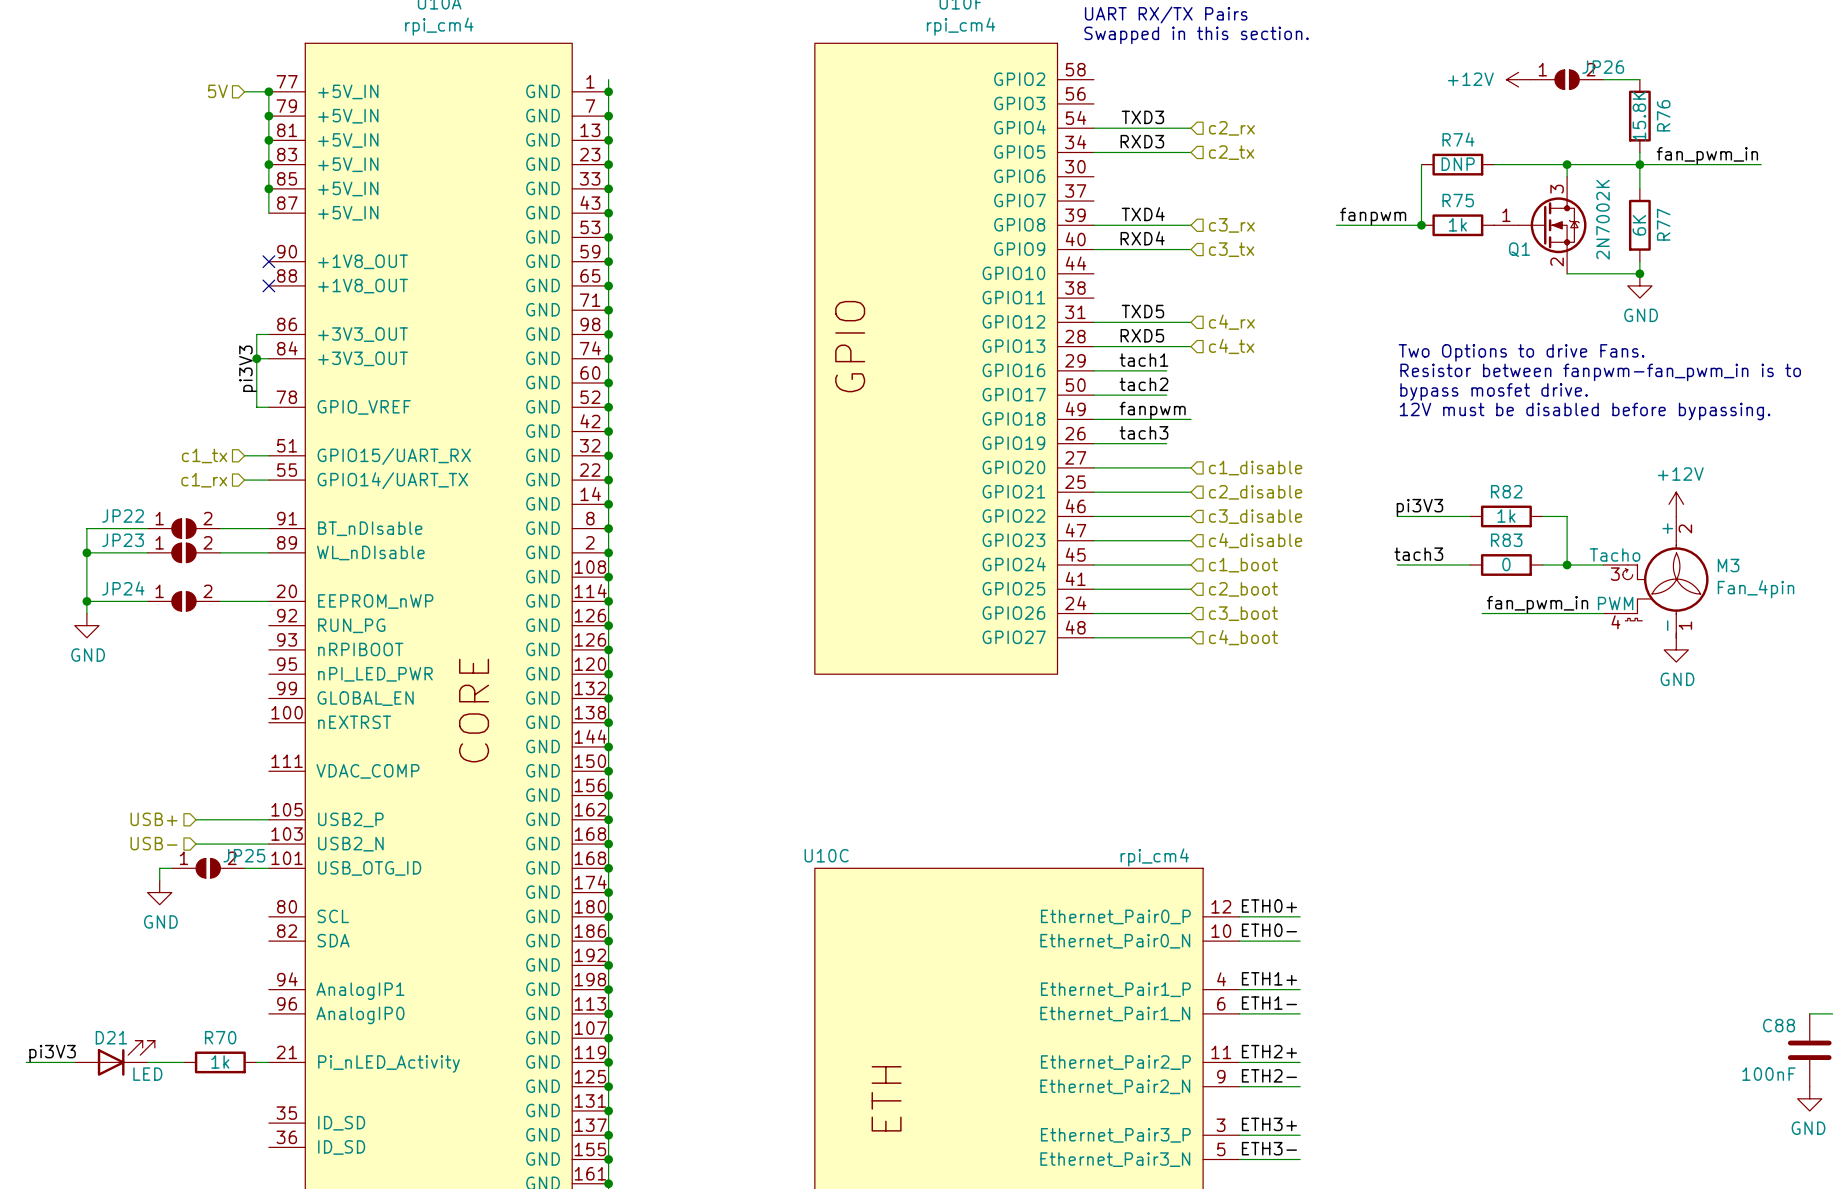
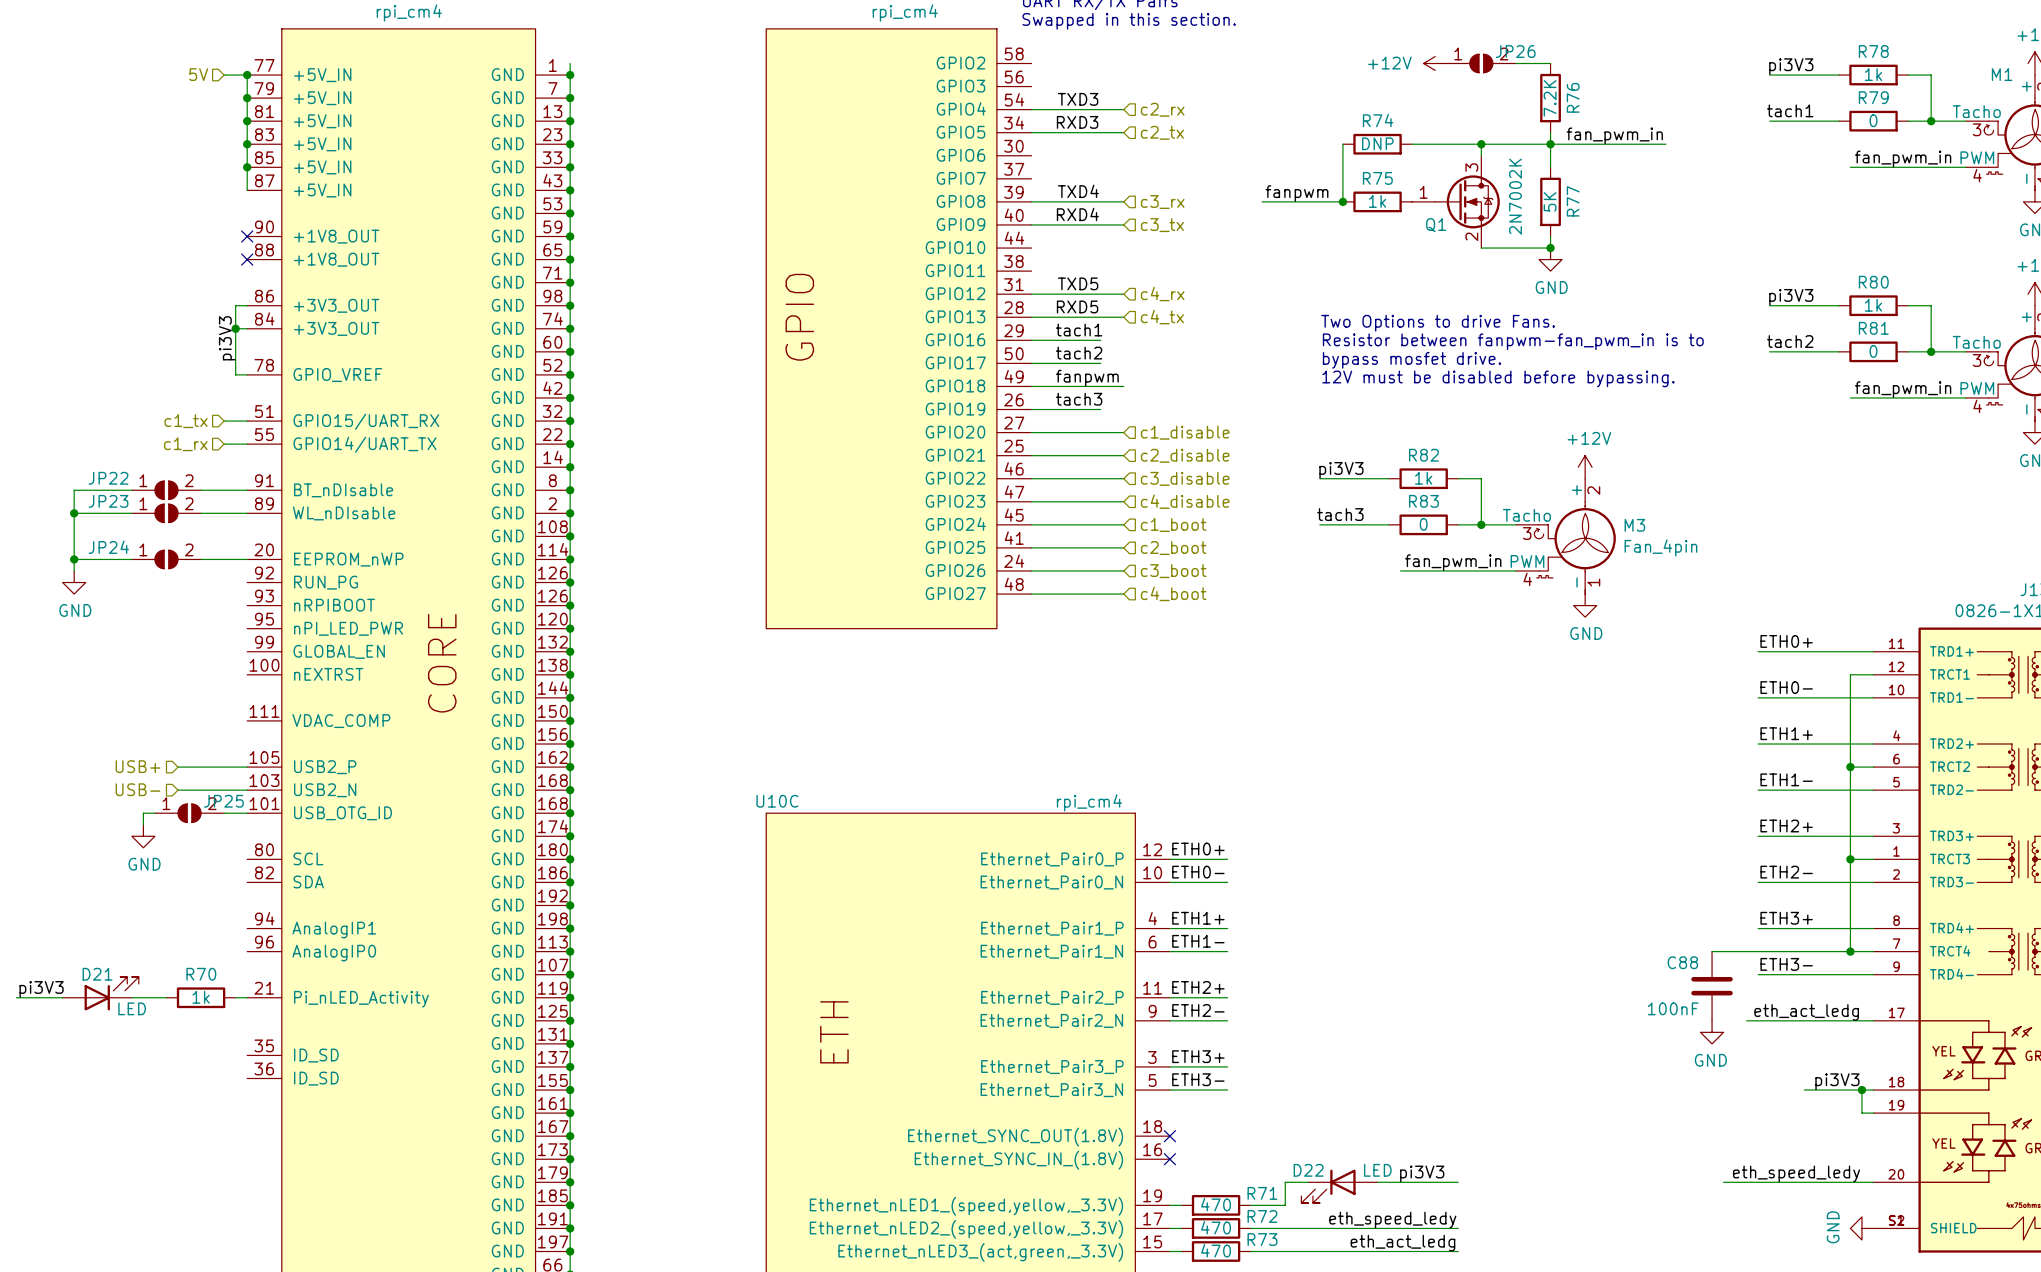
R76 value: 15.8K (1639, 116) -> 7.2K (1550, 98)
R77 value: 6K (1639, 225) -> 5K (1550, 201)

